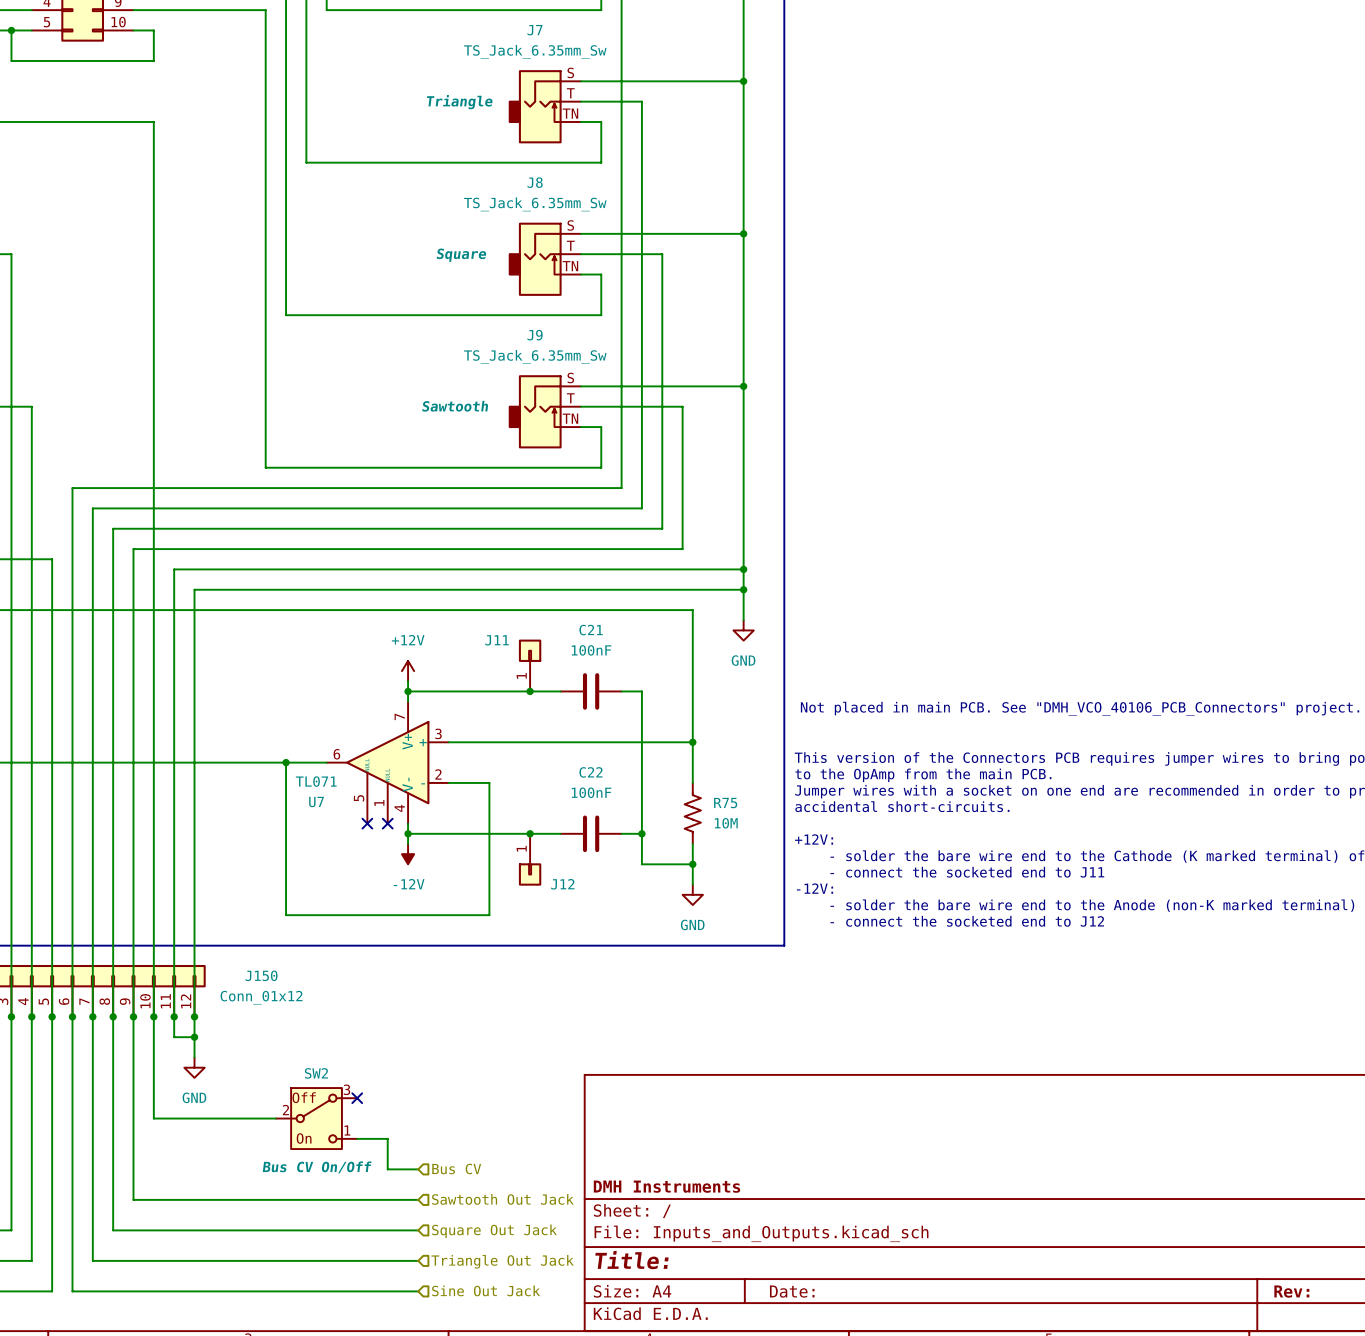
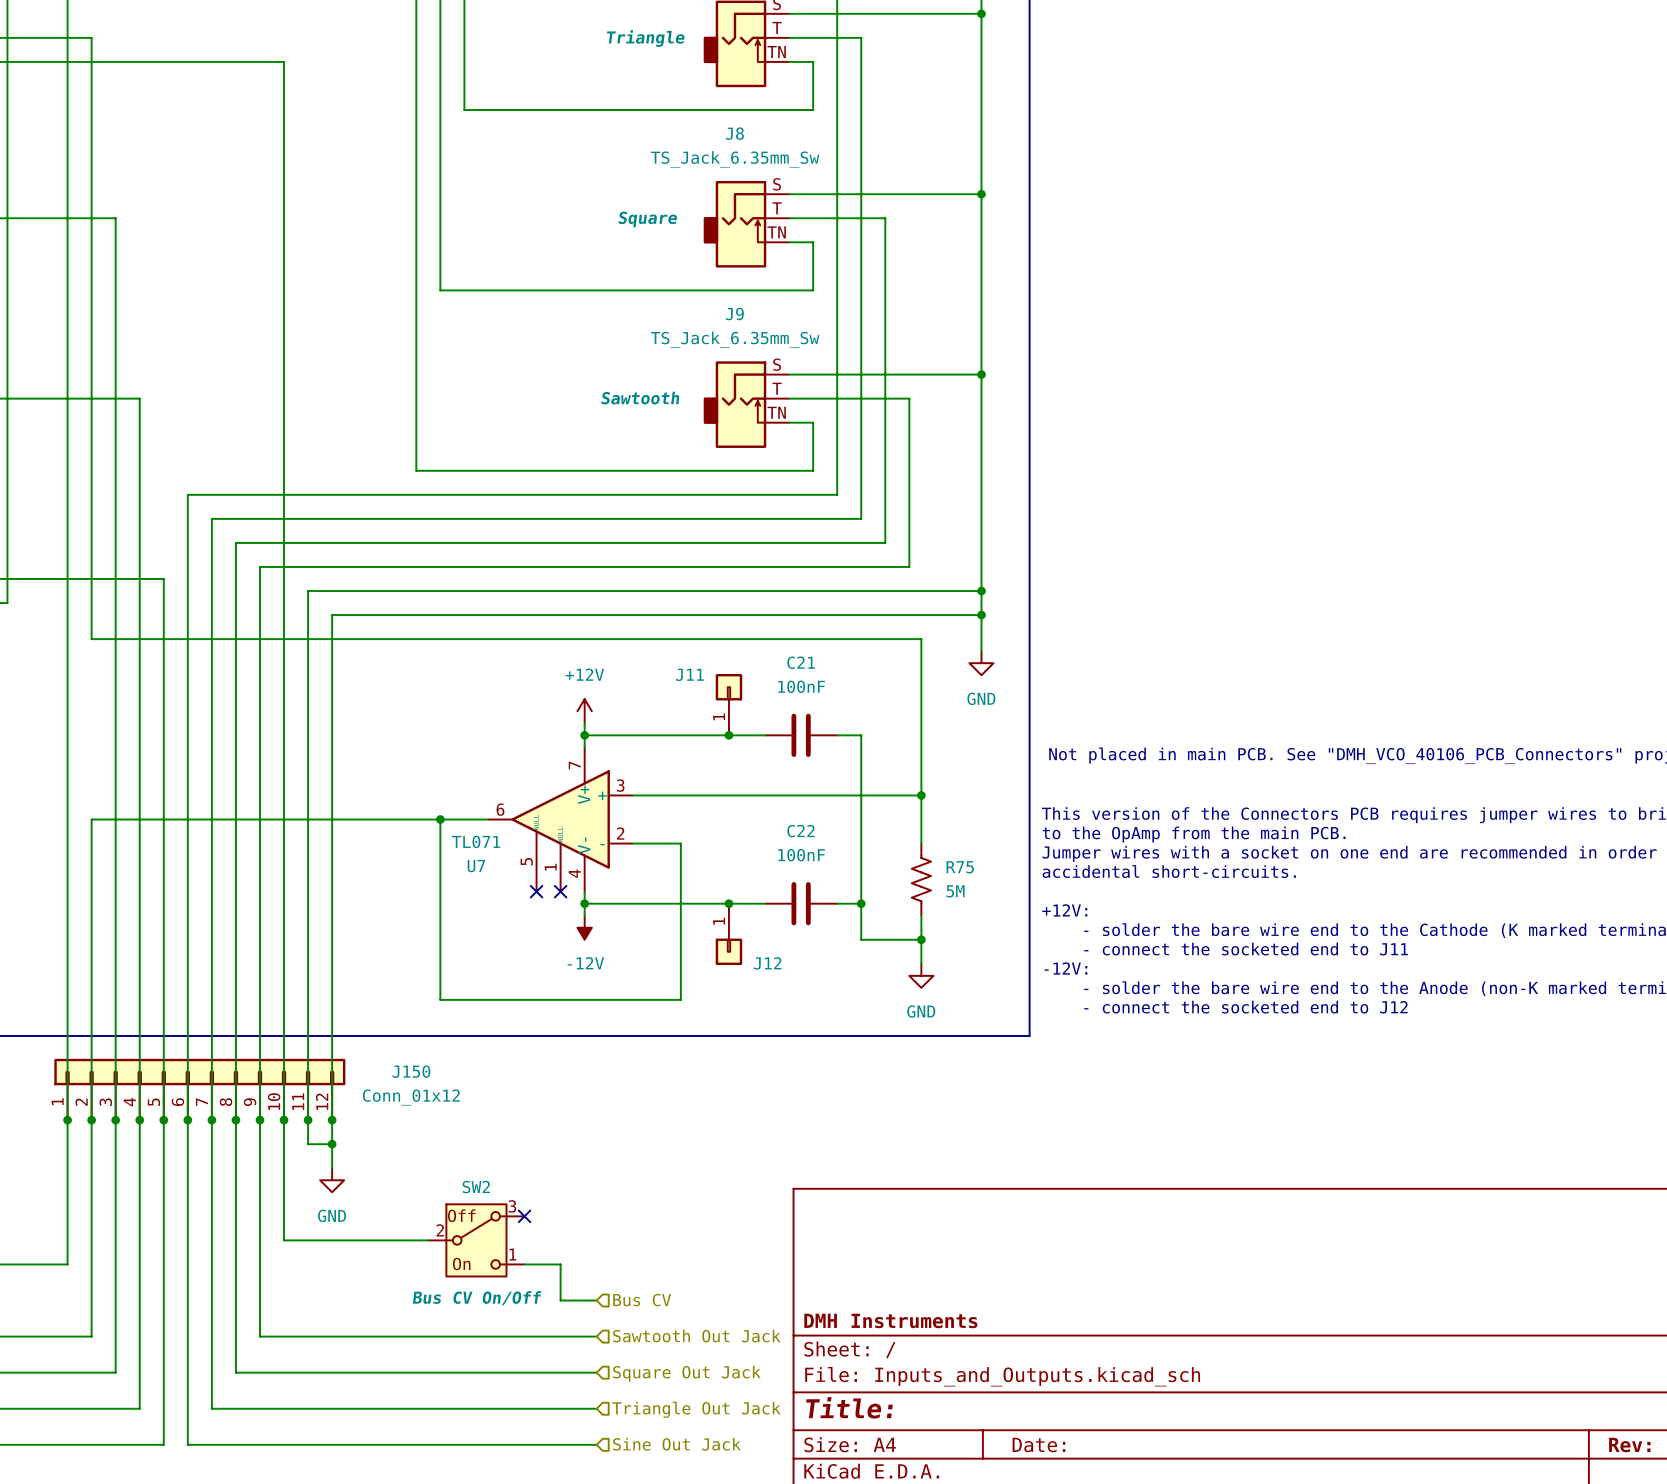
R75 value: 10M (726, 823) -> 5M (955, 891)

